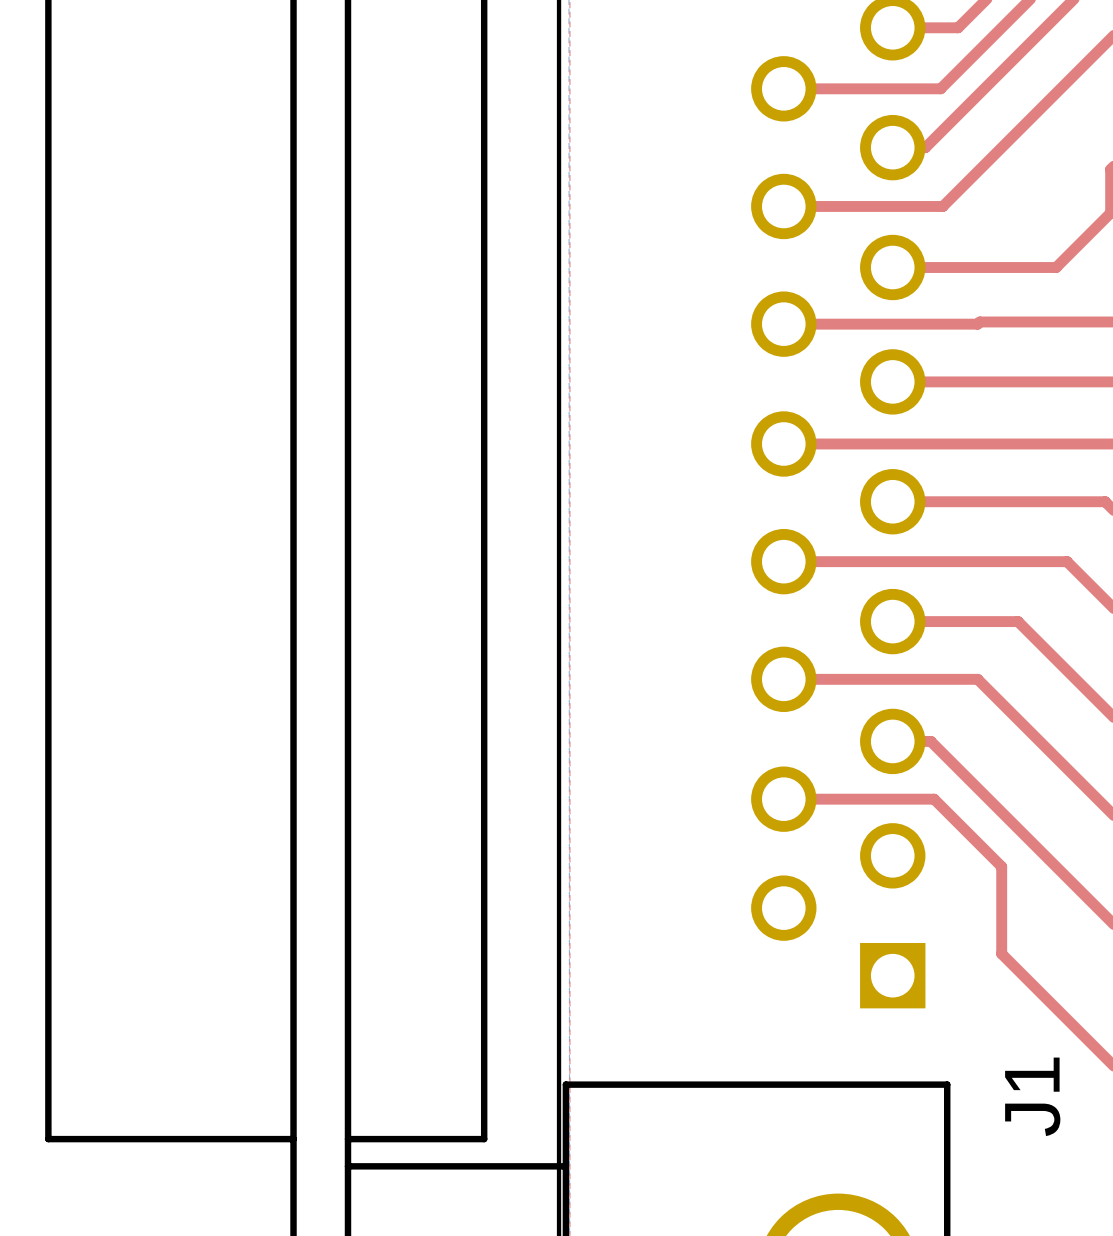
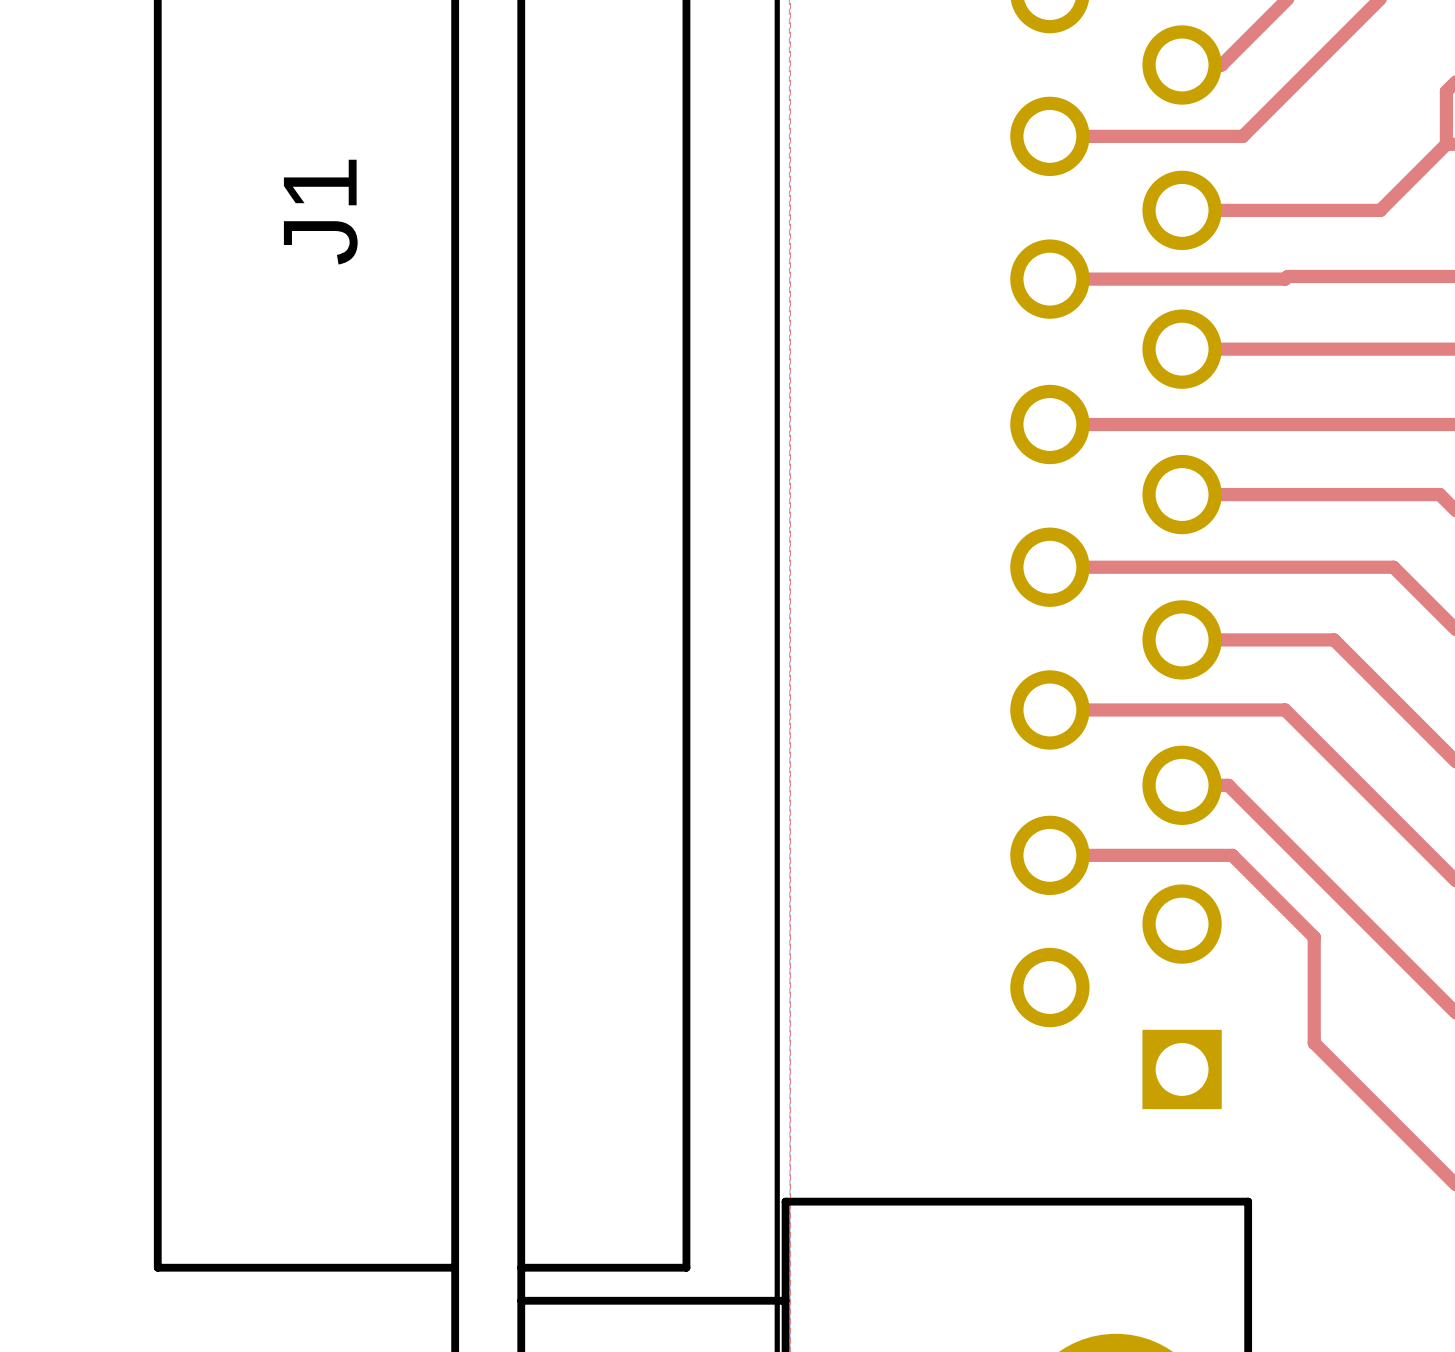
J1 name position: J1 (1032, 1096) -> J1 (320, 212)

